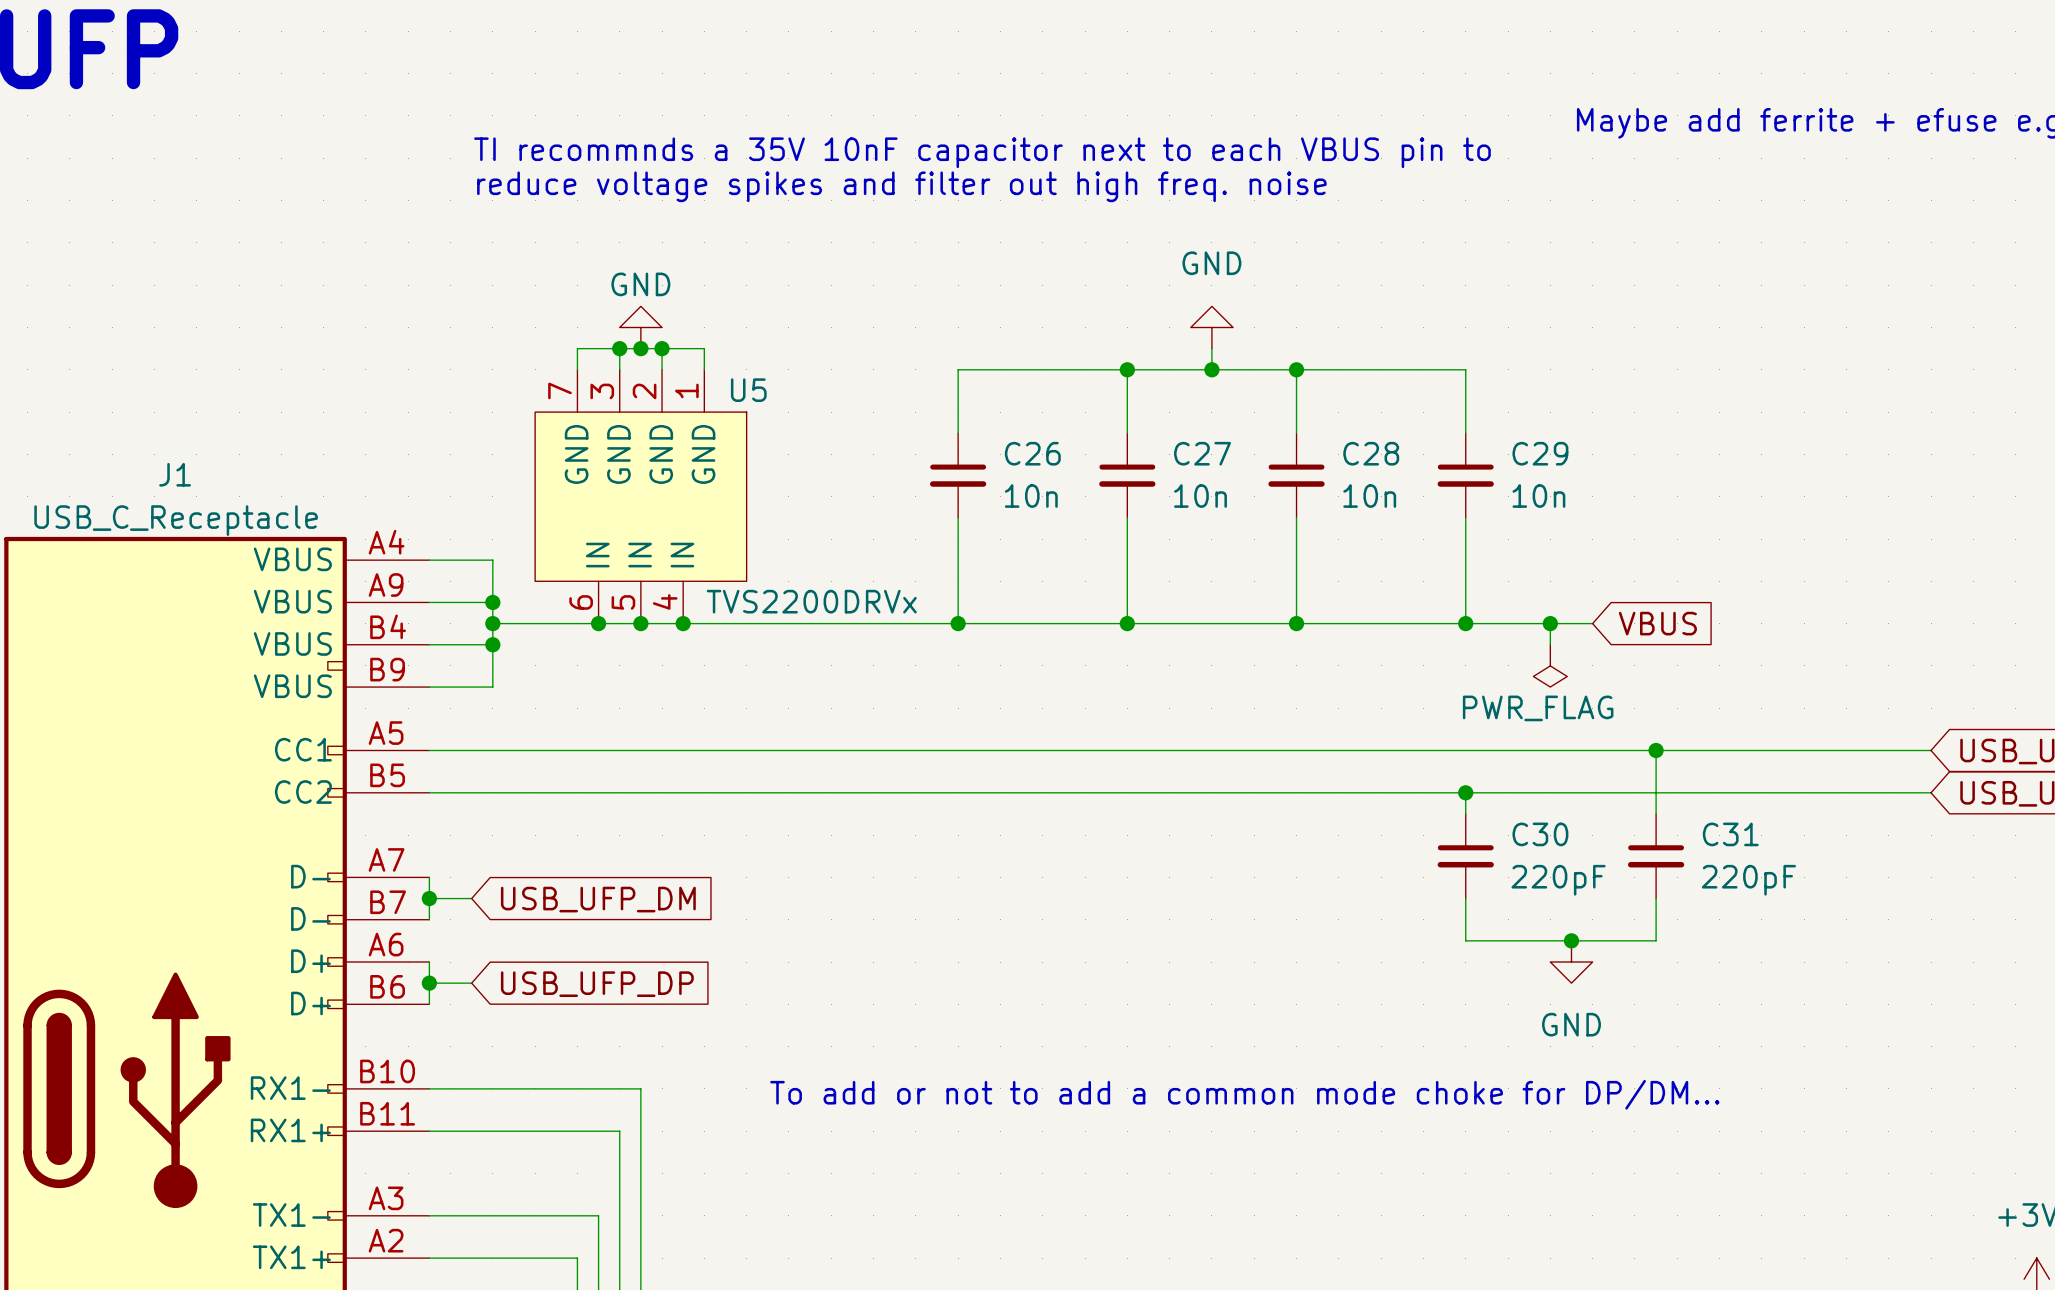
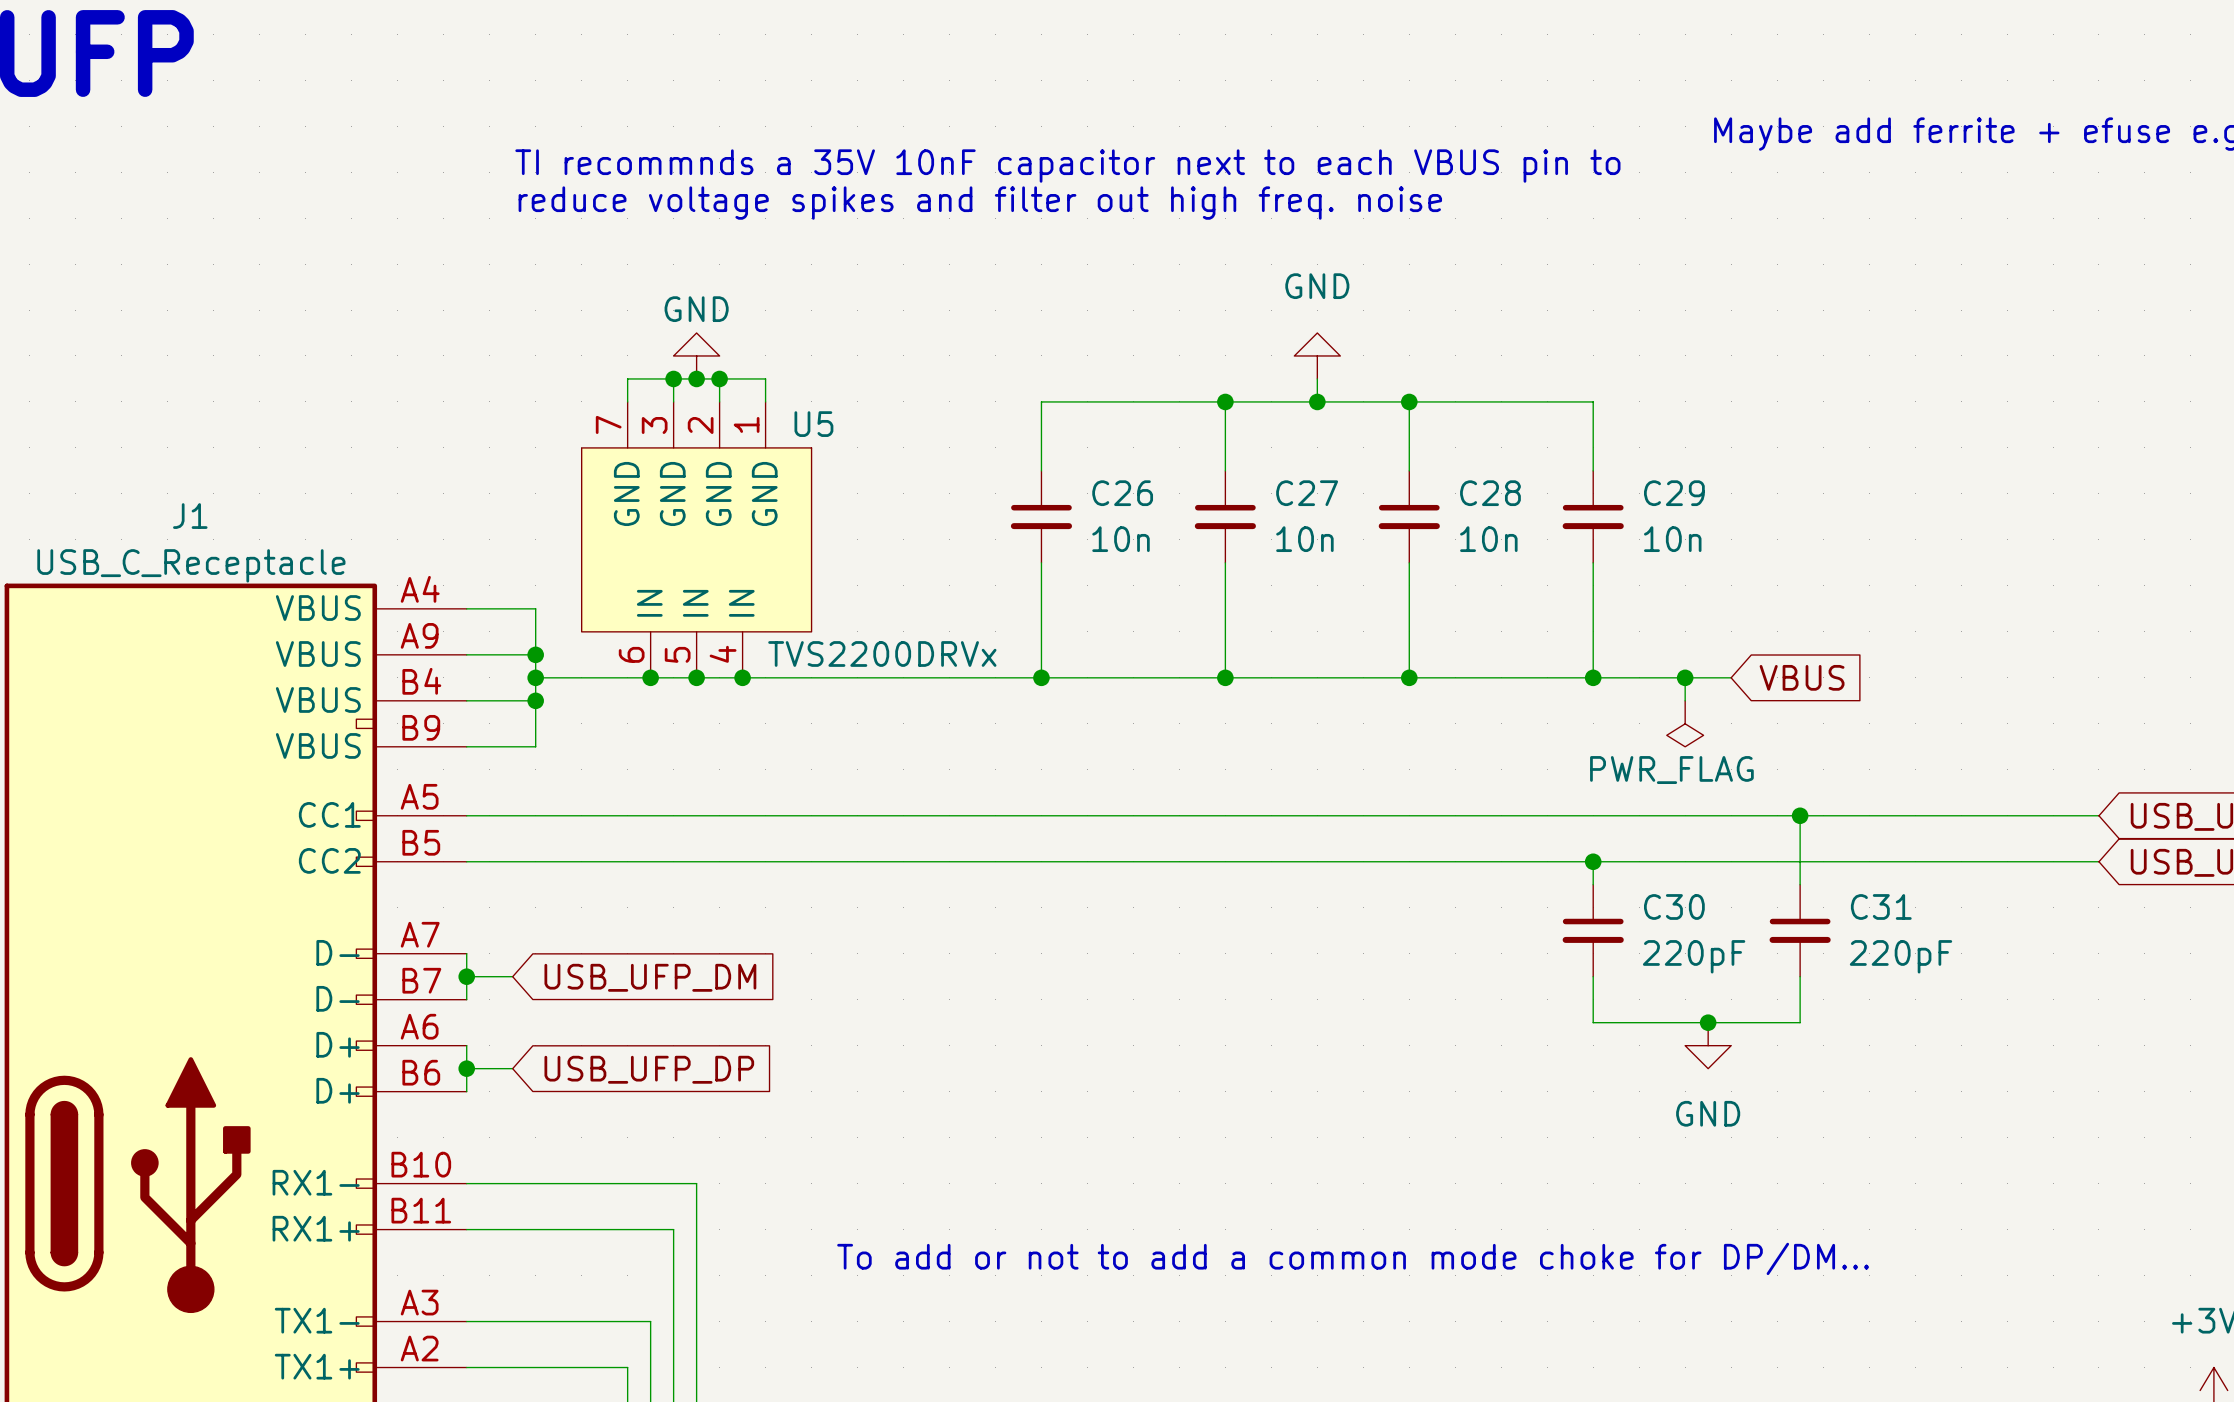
text position: To add or not to add a common mode choke for DP/DM... (1244, 1094) -> To add or not to add a common mode choke for DP/DM... (1353, 1258)

